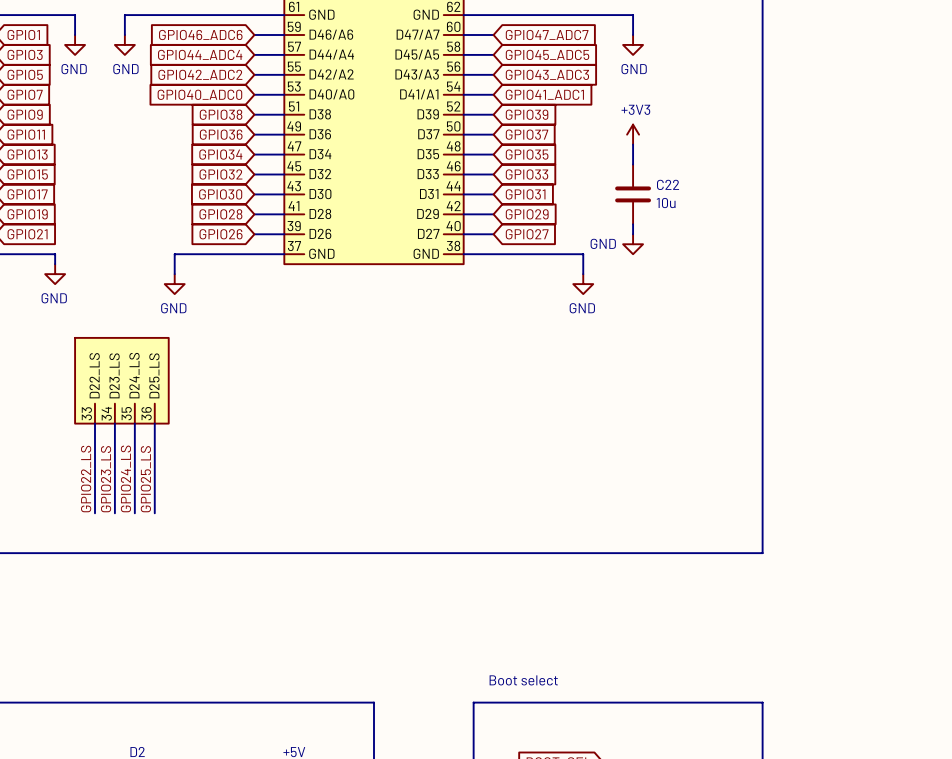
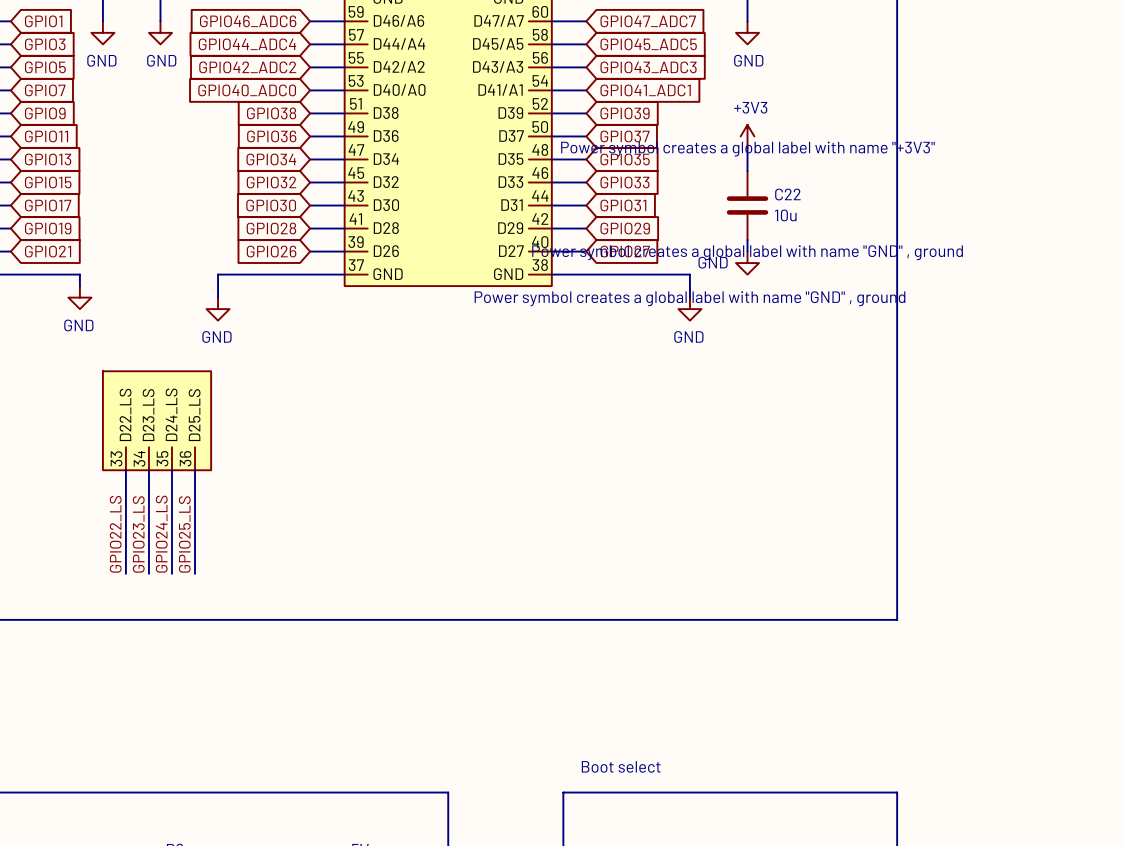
power symbol text: none -> Power symbol creates a global label with name "+3V3" (747, 149)
power symbol text: none -> Power symbol creates a global label with name "GND" , ground (747, 252)
power symbol text: none -> Power symbol creates a global label with name "GND" , ground (690, 298)

